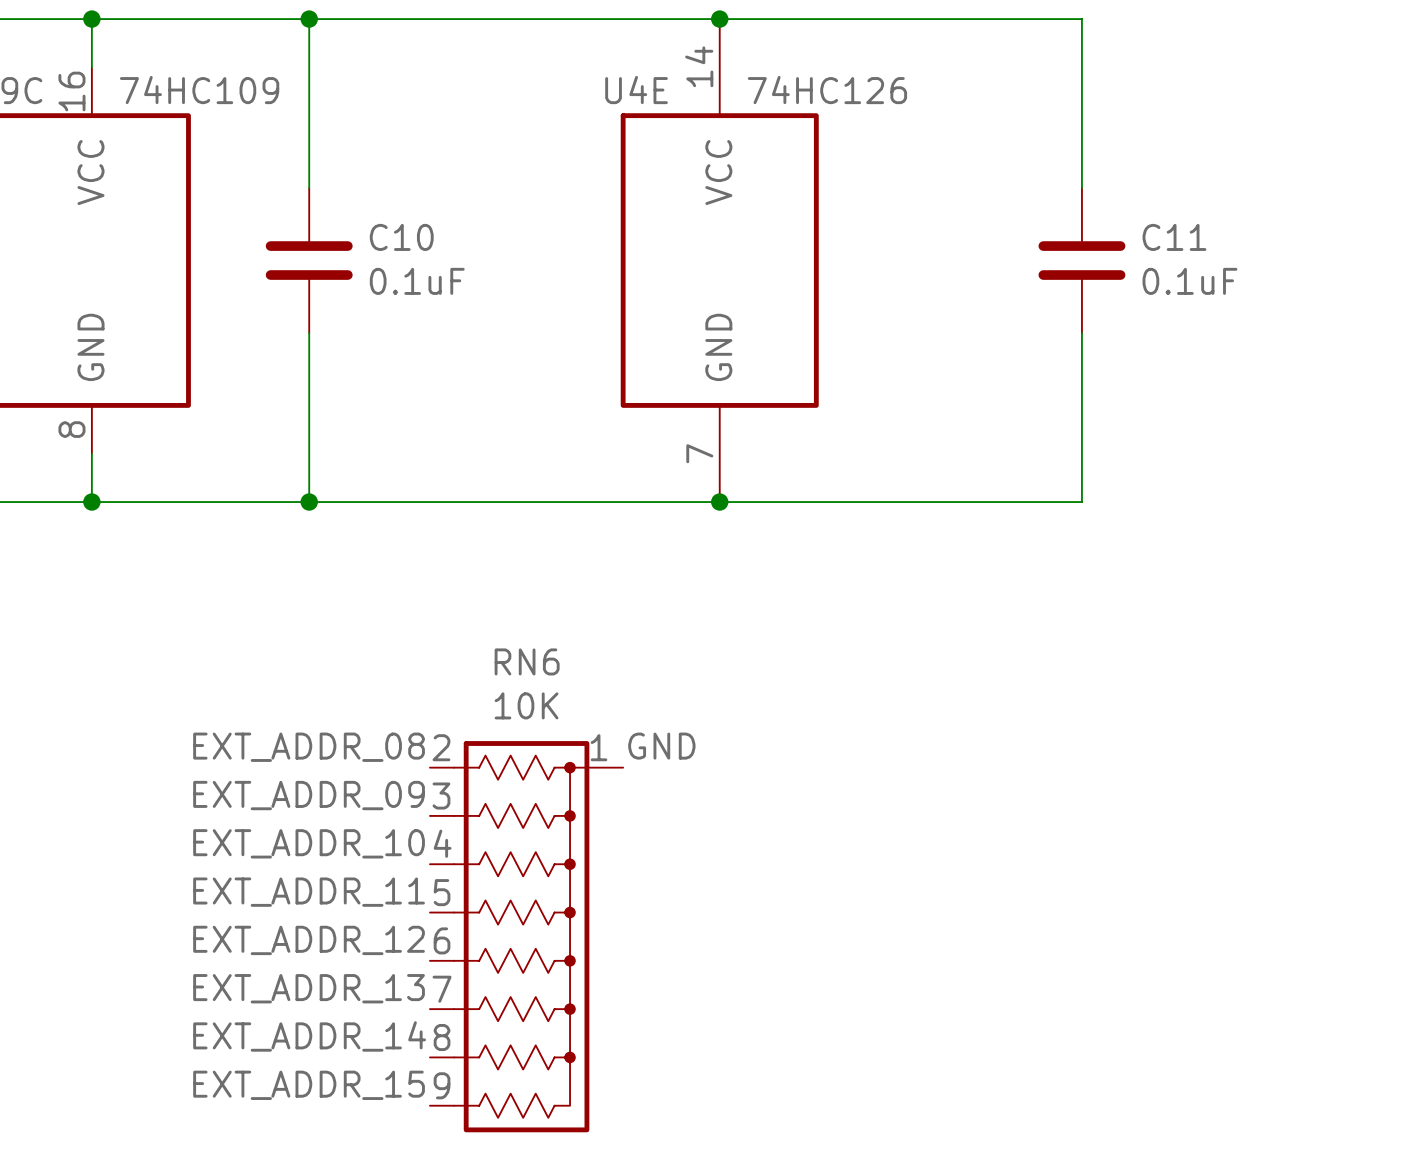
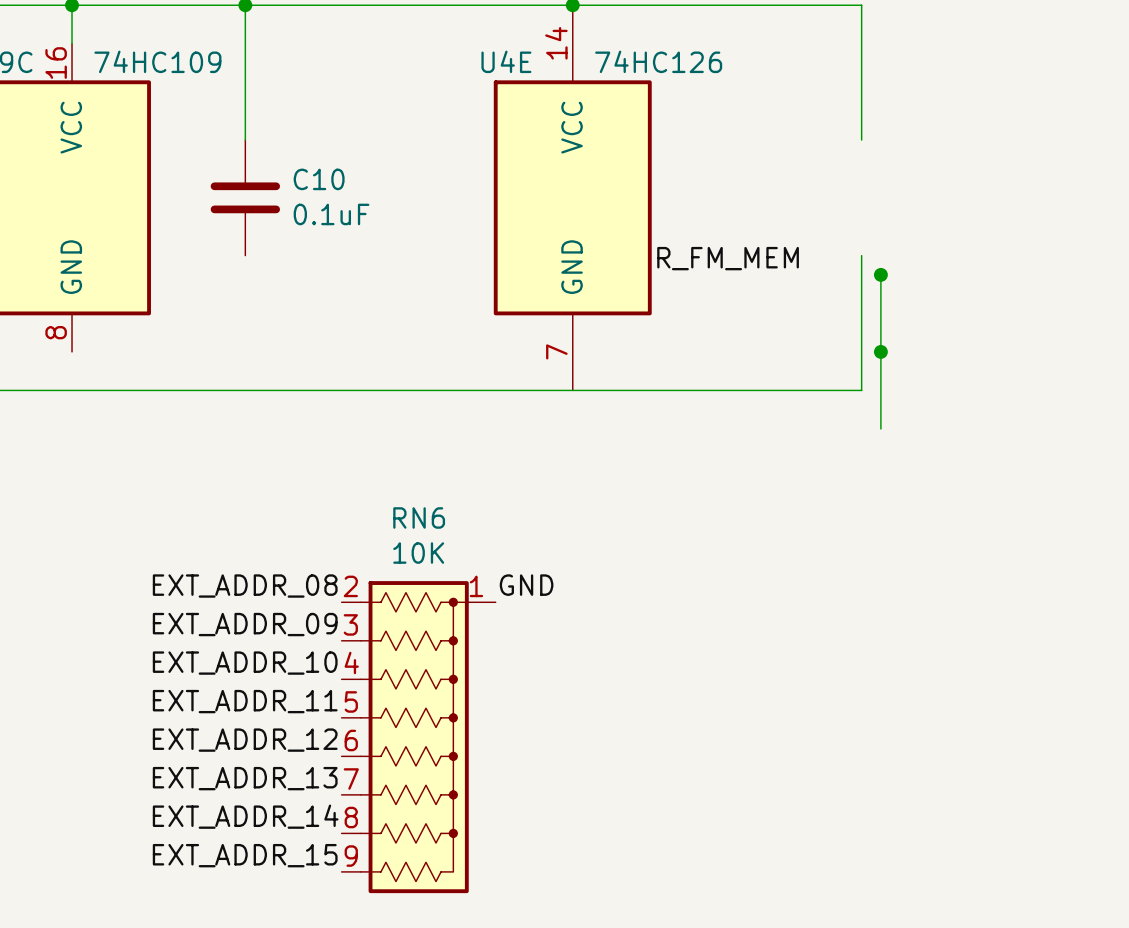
C11: 0.1uF (1081, 260) -> none
wire: (309, 332) (309, 502) -> none
label: none -> R_FM_MEM (728, 258)
wire: none -> (880, 274) (880, 428)
junction: none -> (880, 274)
wire: (91, 453) (91, 502) -> none
junction: none -> (880, 351)
junction: (91, 502) -> none
junction: (309, 502) -> none
junction: (719, 502) -> none

